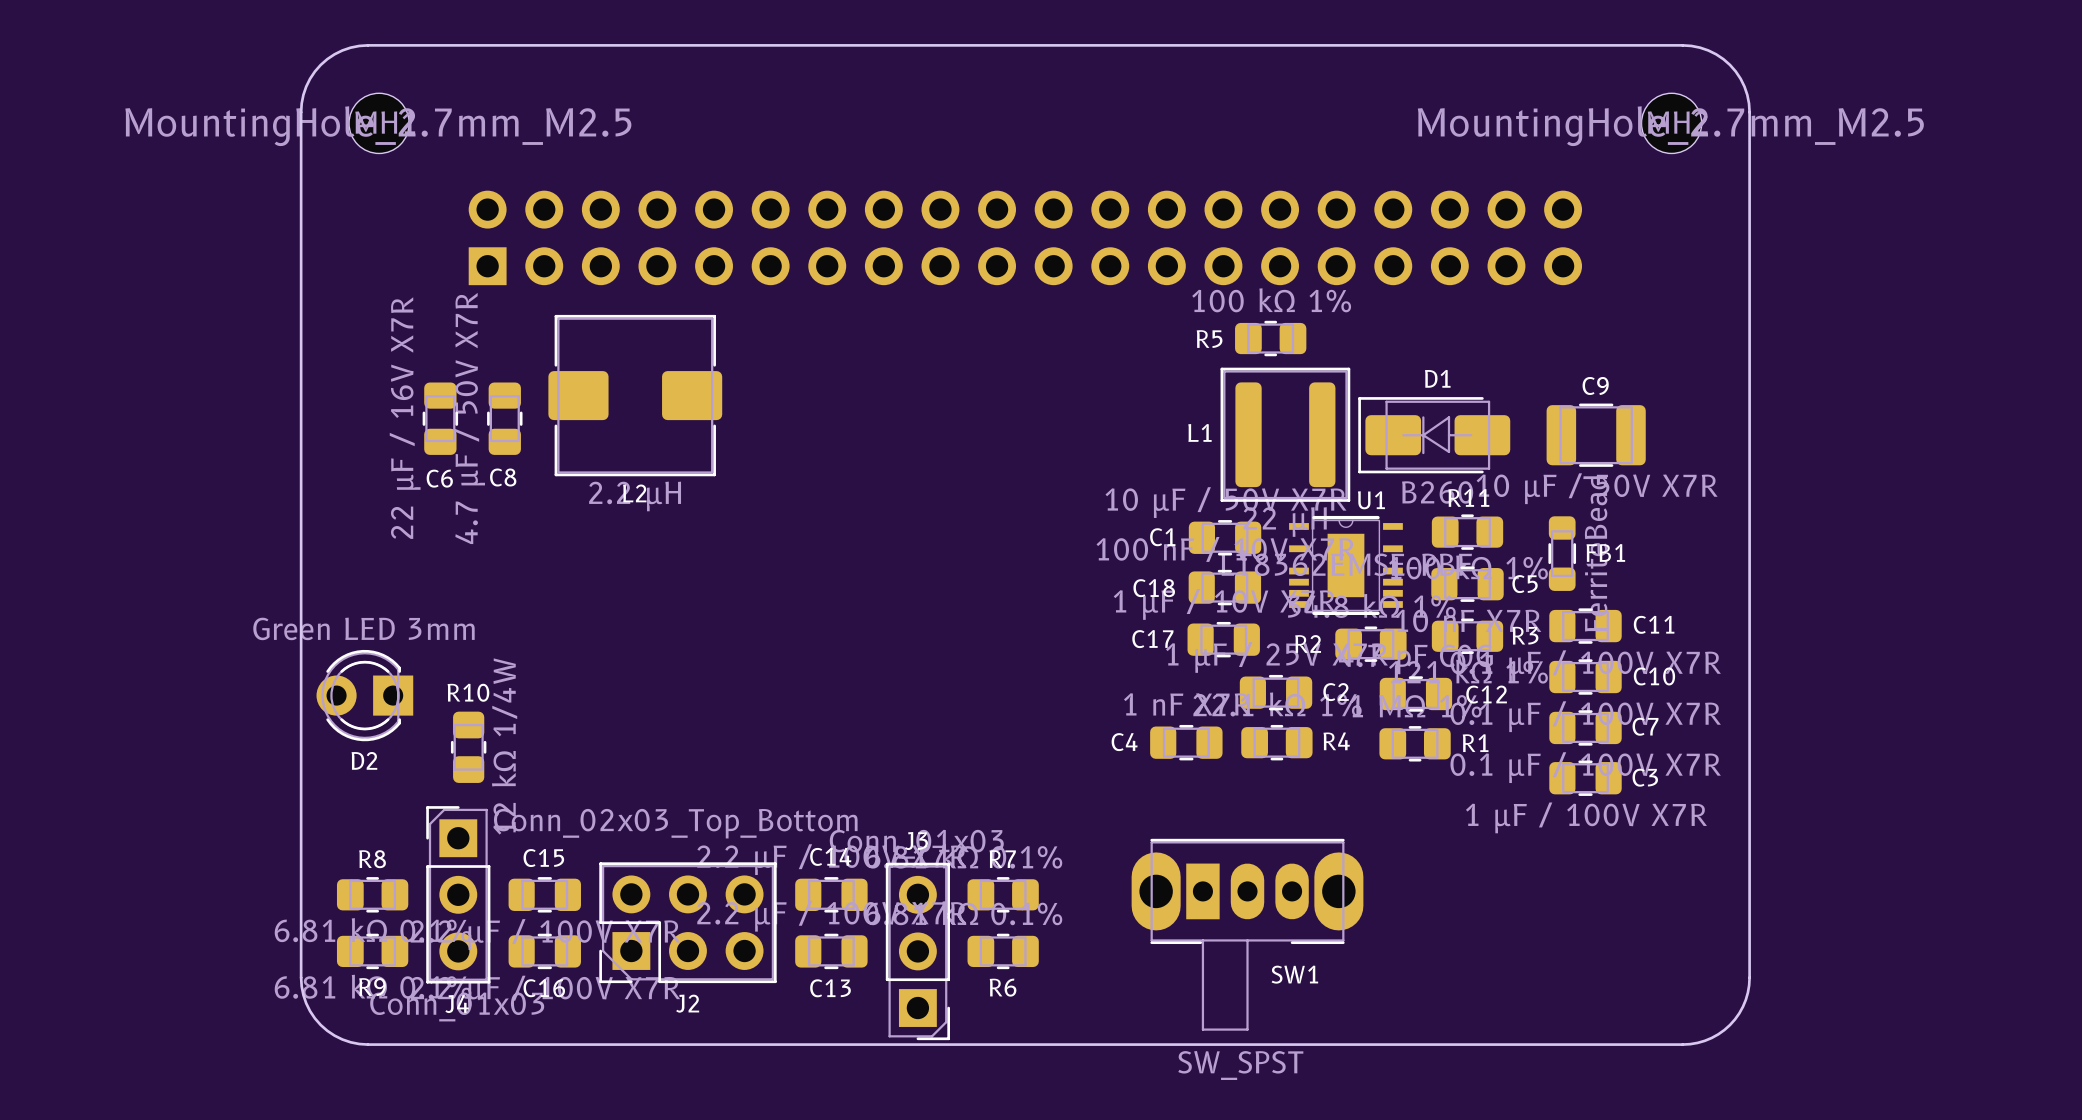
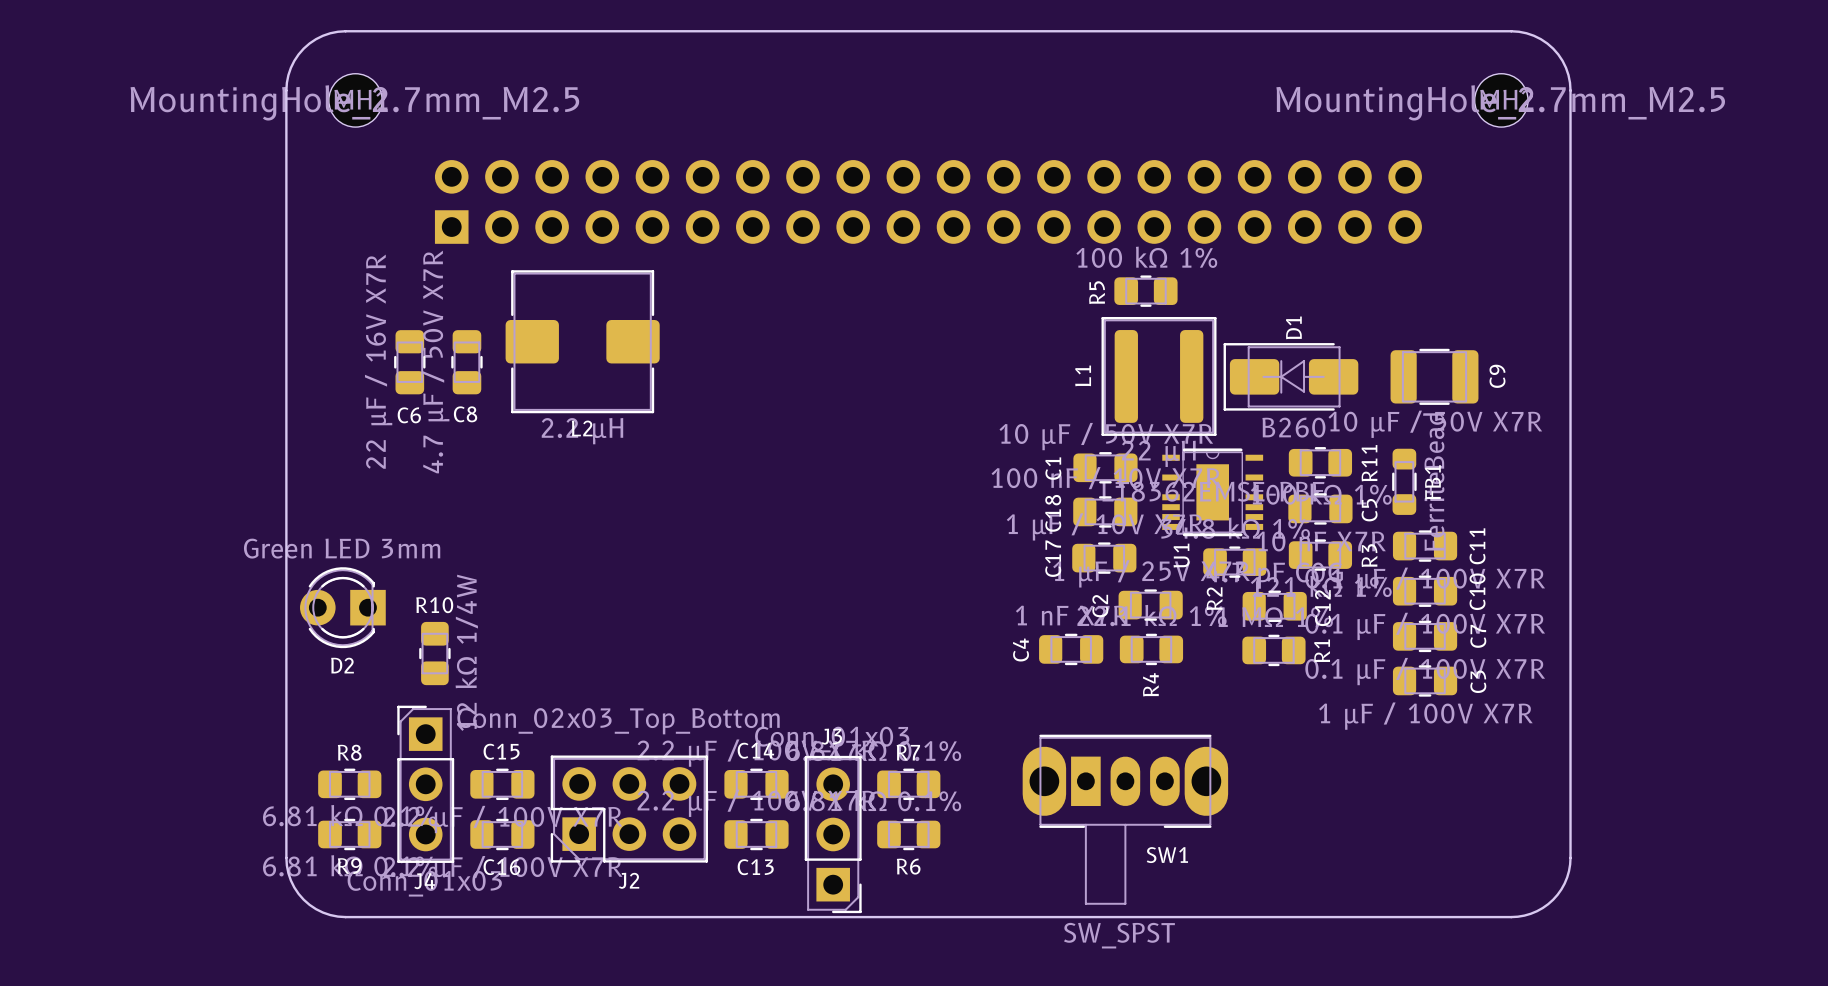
R5 name rotation: 0° (1209, 339) -> 90° counterclockwise (1097, 292)
D1 name rotation: 0° (1437, 378) -> 90° counterclockwise (1293, 327)
C9 name rotation: 0° (1595, 385) -> 90° counterclockwise (1497, 376)
C9 name position: C9 (1595, 385) -> C9 (1497, 376)
L1 name rotation: 0° (1199, 432) -> 90° counterclockwise (1083, 375)
R11 name rotation: 0° (1468, 497) -> 90° counterclockwise (1369, 463)
R11 name position: R11 (1468, 497) -> R11 (1369, 463)
U1 name rotation: 0° (1371, 500) -> 90° counterclockwise (1181, 555)
U1 name position: U1 (1371, 500) -> U1 (1181, 555)
C1 name rotation: 0° (1162, 537) -> 90° counterclockwise (1053, 468)
FB1 name rotation: 0° (1605, 552) -> 90° counterclockwise (1432, 482)
C5 name rotation: 0° (1525, 584) -> 90° counterclockwise (1369, 510)
C18 name rotation: 0° (1154, 588) -> 90° counterclockwise (1053, 513)
C11 name rotation: 0° (1654, 624) -> 90° counterclockwise (1477, 546)
R3 name rotation: 0° (1525, 635) -> 90° counterclockwise (1369, 555)
C17 name rotation: 0° (1152, 639) -> 90° counterclockwise (1053, 558)
R2 name rotation: 0° (1308, 643) -> 90° counterclockwise (1214, 598)
R2 name position: R2 (1308, 643) -> R2 (1214, 598)
C10 name rotation: 0° (1654, 676) -> 90° counterclockwise (1477, 591)
C2 name rotation: 0° (1336, 692) -> 90° counterclockwise (1100, 606)
C2 name position: C2 (1336, 692) -> C2 (1100, 606)
C12 name rotation: 0° (1486, 694) -> 90° counterclockwise (1322, 608)
C7 name rotation: 0° (1645, 726) -> 90° counterclockwise (1478, 636)
R4 name rotation: 0° (1336, 741) -> 90° counterclockwise (1150, 684)
R4 name position: R4 (1336, 741) -> R4 (1150, 684)
C4 name rotation: 0° (1124, 742) -> 90° counterclockwise (1021, 650)
R1 name rotation: 0° (1475, 743) -> 90° counterclockwise (1322, 650)
C3 name rotation: 0° (1645, 777) -> 90° counterclockwise (1478, 681)

